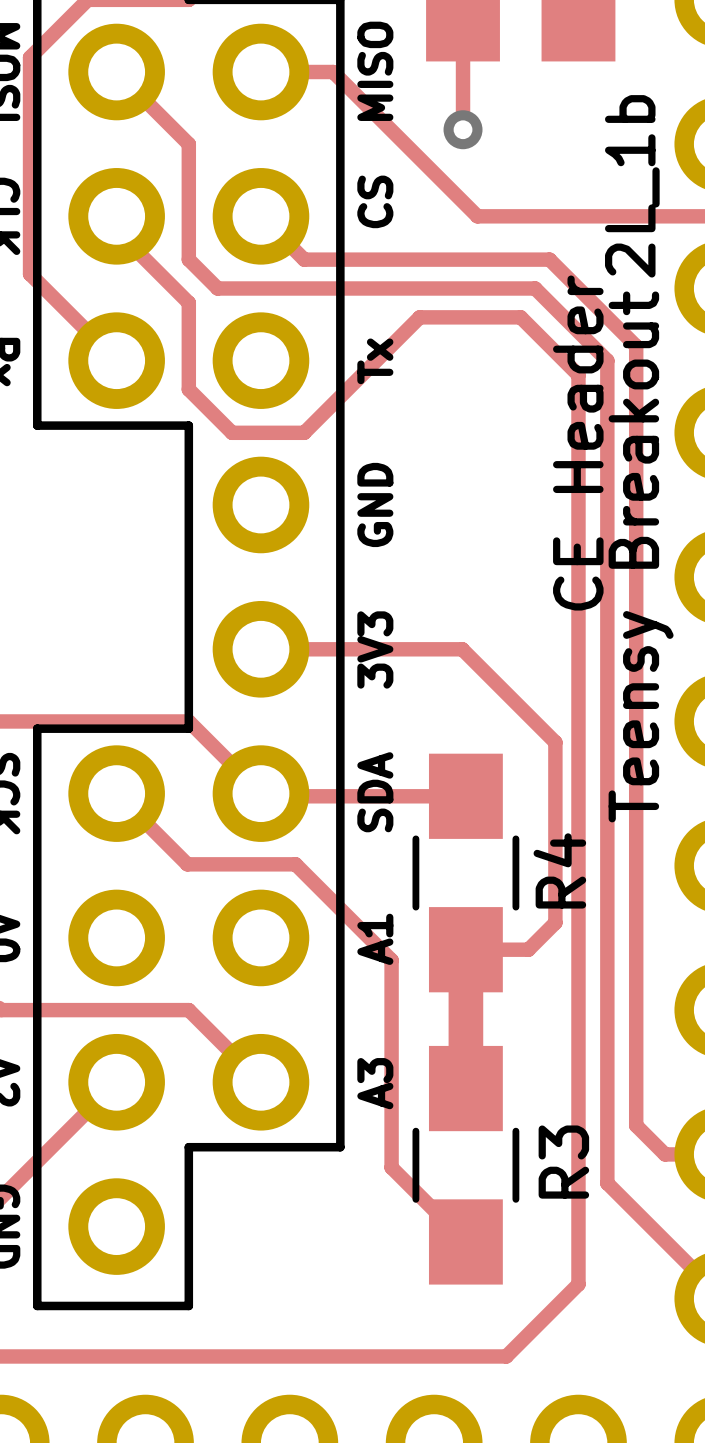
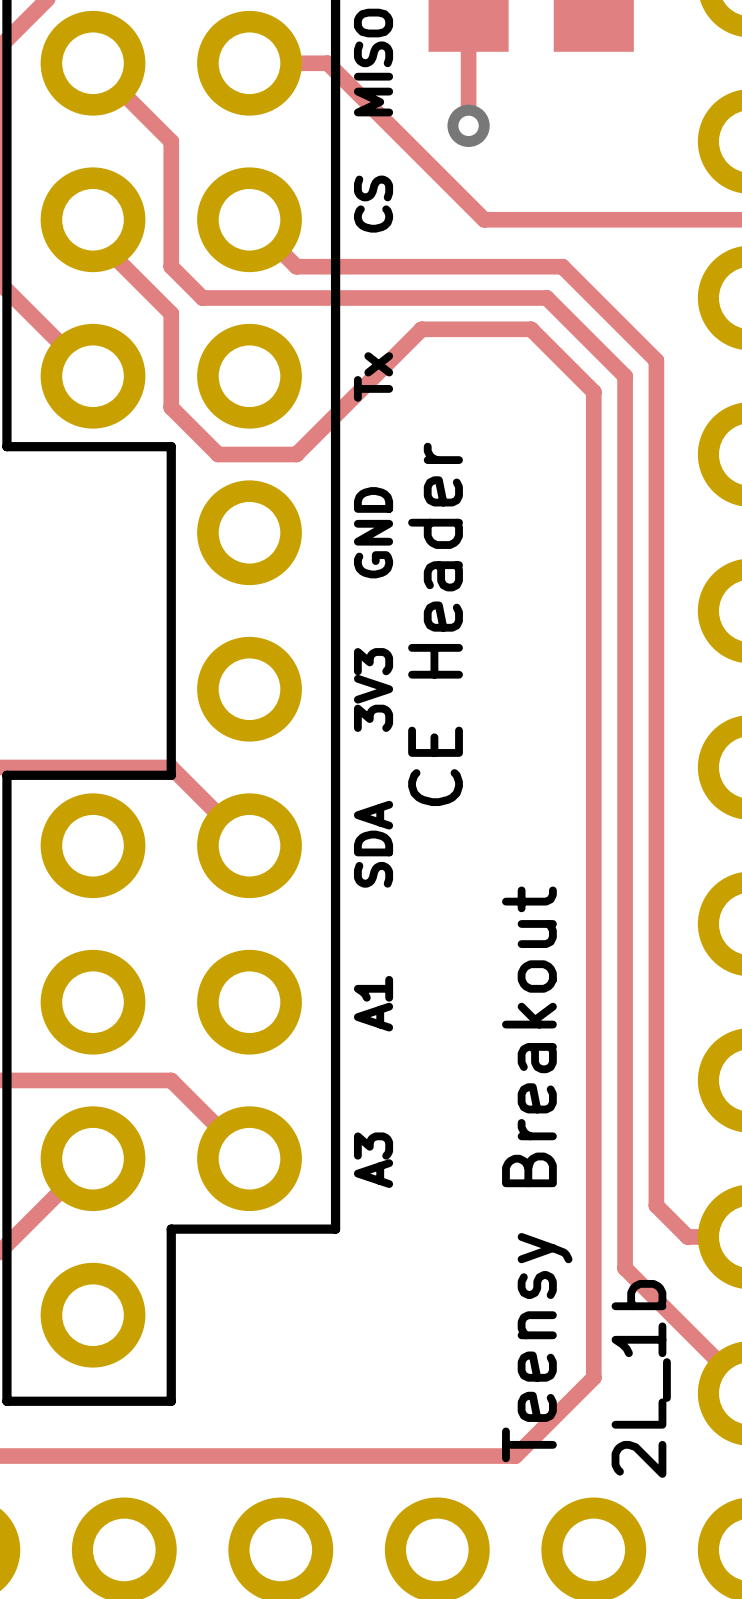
text position: 2L_1b (632, 186) -> 2L_1b (641, 1378)
text position: CE Header (578, 443) -> CE Header (435, 624)
text position: Teensy Breakout (641, 556) -> Teensy Breakout (537, 1174)
track: (260, 649) (462, 649) (555, 742) (555, 922) (528, 949) (465, 949) (465, 1088) -> none
track: (116, 793) (187, 864) (295, 864) (391, 960) (391, 1167) (465, 1241) -> none
track: (260, 793) (263, 796) (465, 796) -> none
R4: (465, 873) -> none
R3: (465, 1165) -> none

